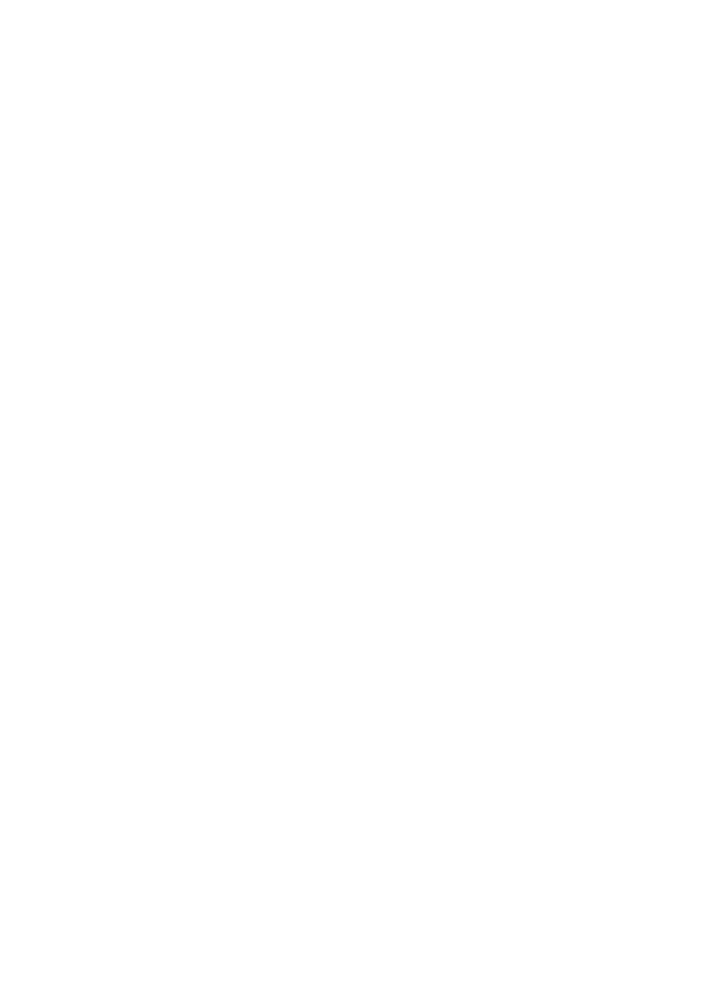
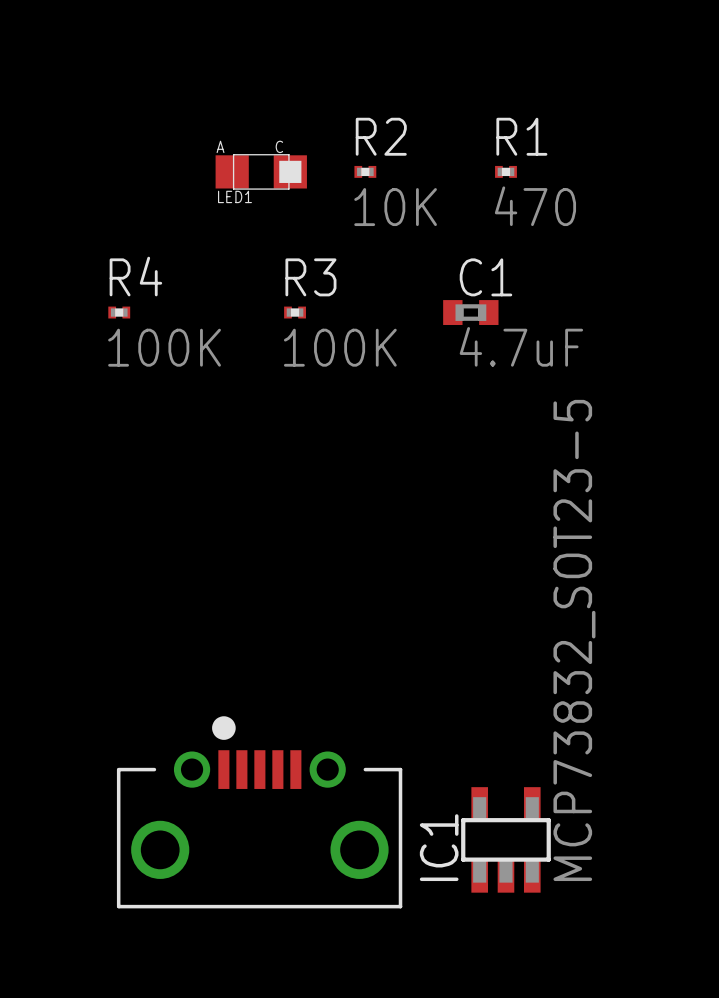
LED1: none -> (261, 171)
R2: none -> 10K (365, 171)
R1: none -> 470 (505, 171)
R4: none -> 100K (119, 312)
R3: none -> 100K (295, 312)
C1: none -> 4.7uF (470, 312)
part: none -> (259, 812)
IC1: none -> MCP73832_SOT23-5 (505, 839)

